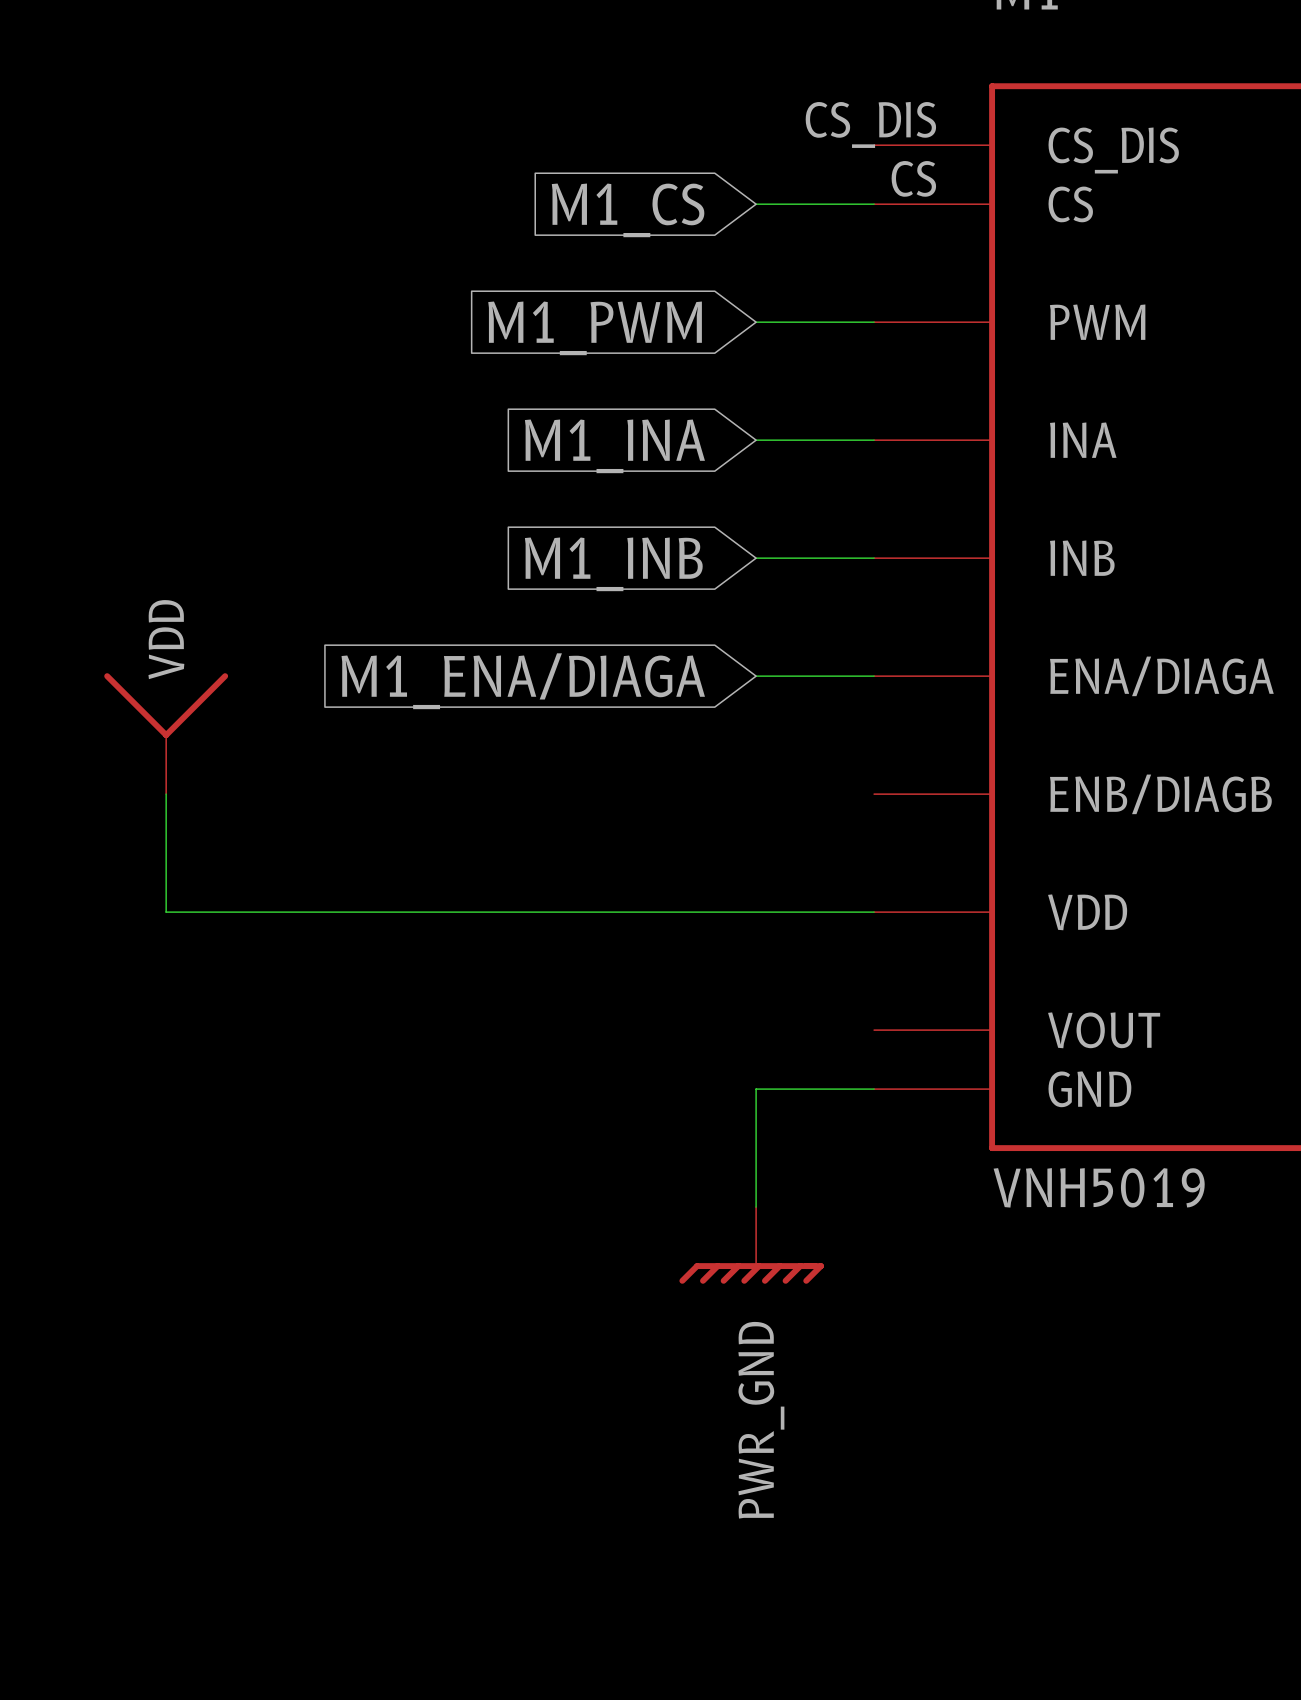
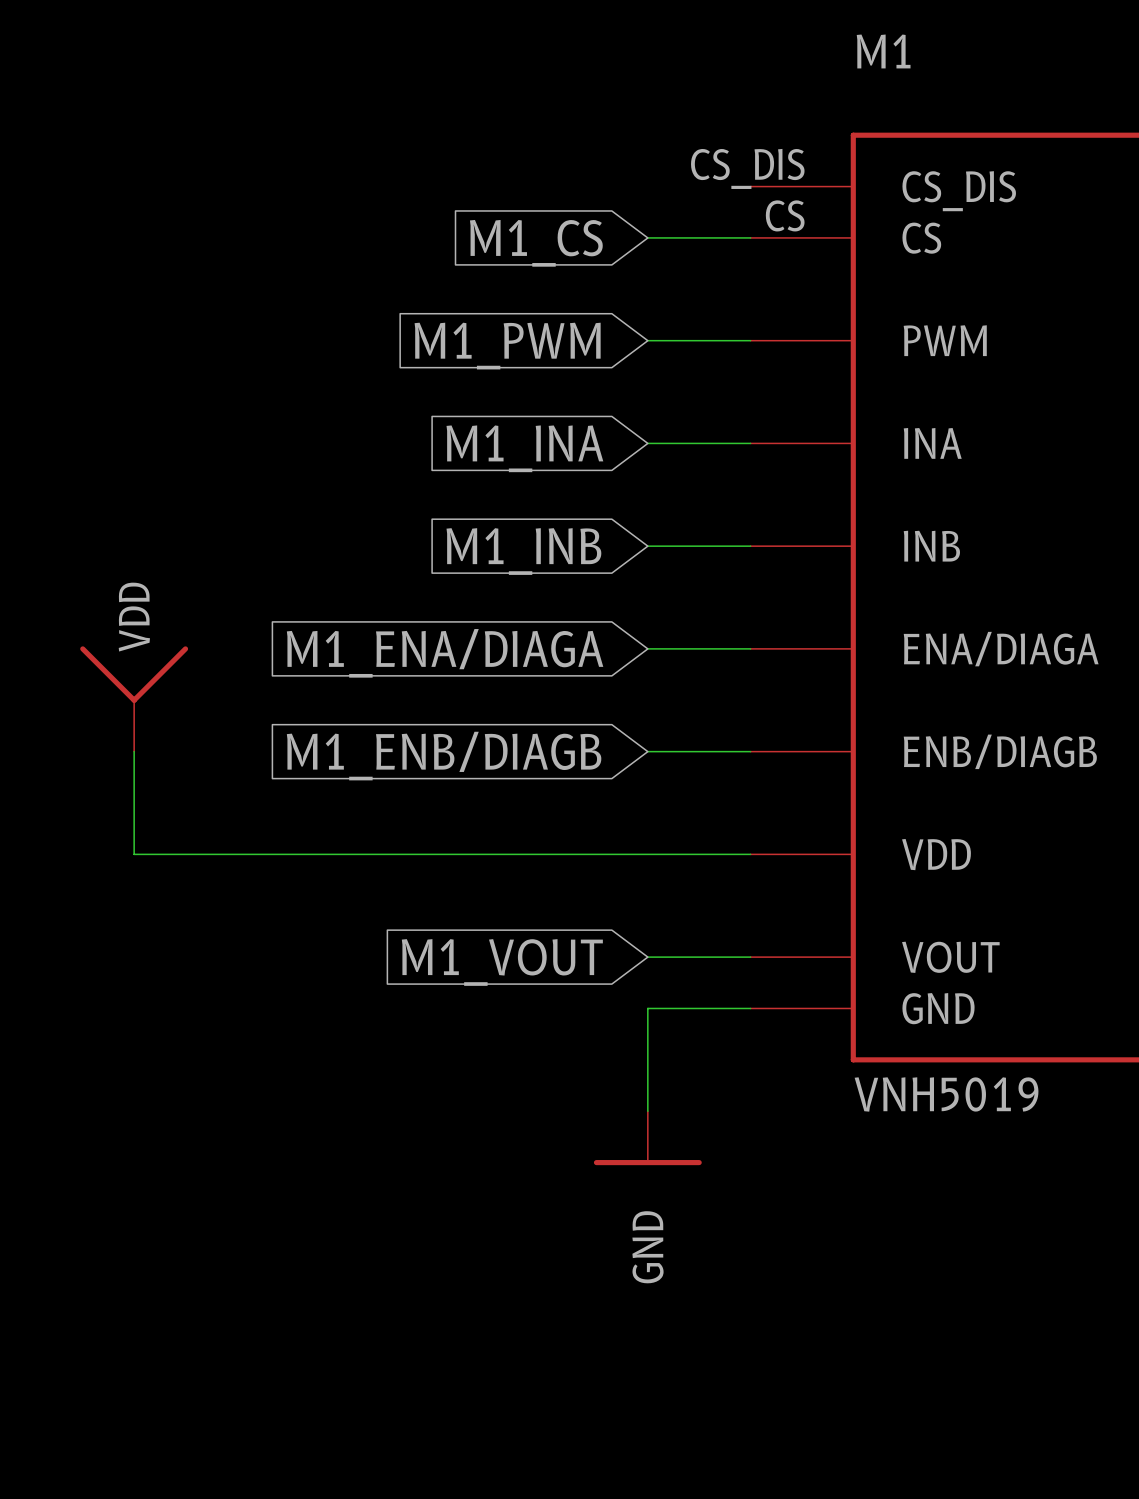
wire: none -> (647, 751) (750, 751)
global label: none -> M1_ENB/DIAGB (444, 756)
wire: none -> (647, 957) (750, 957)
global label: none -> M1_VOUT (502, 962)
power symbol shape: [679, 1207, 824, 1284] -> [593, 1111, 702, 1166]

